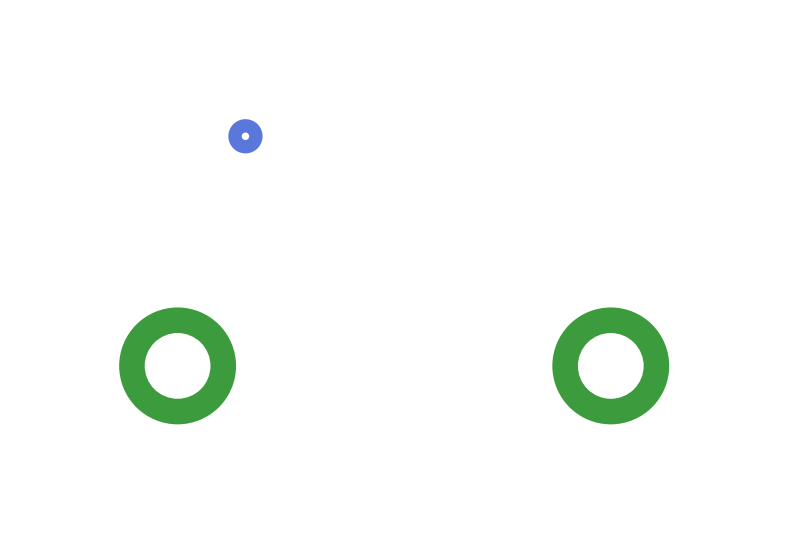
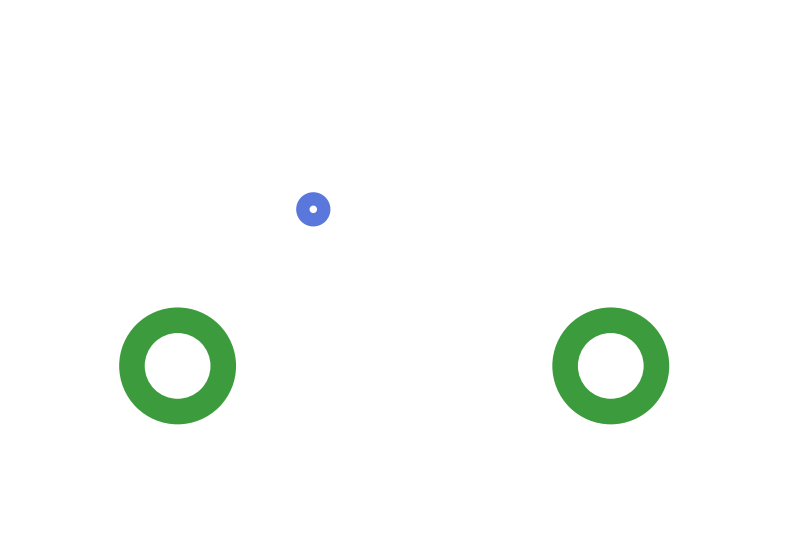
drawing position: (245, 136) -> (313, 209)

